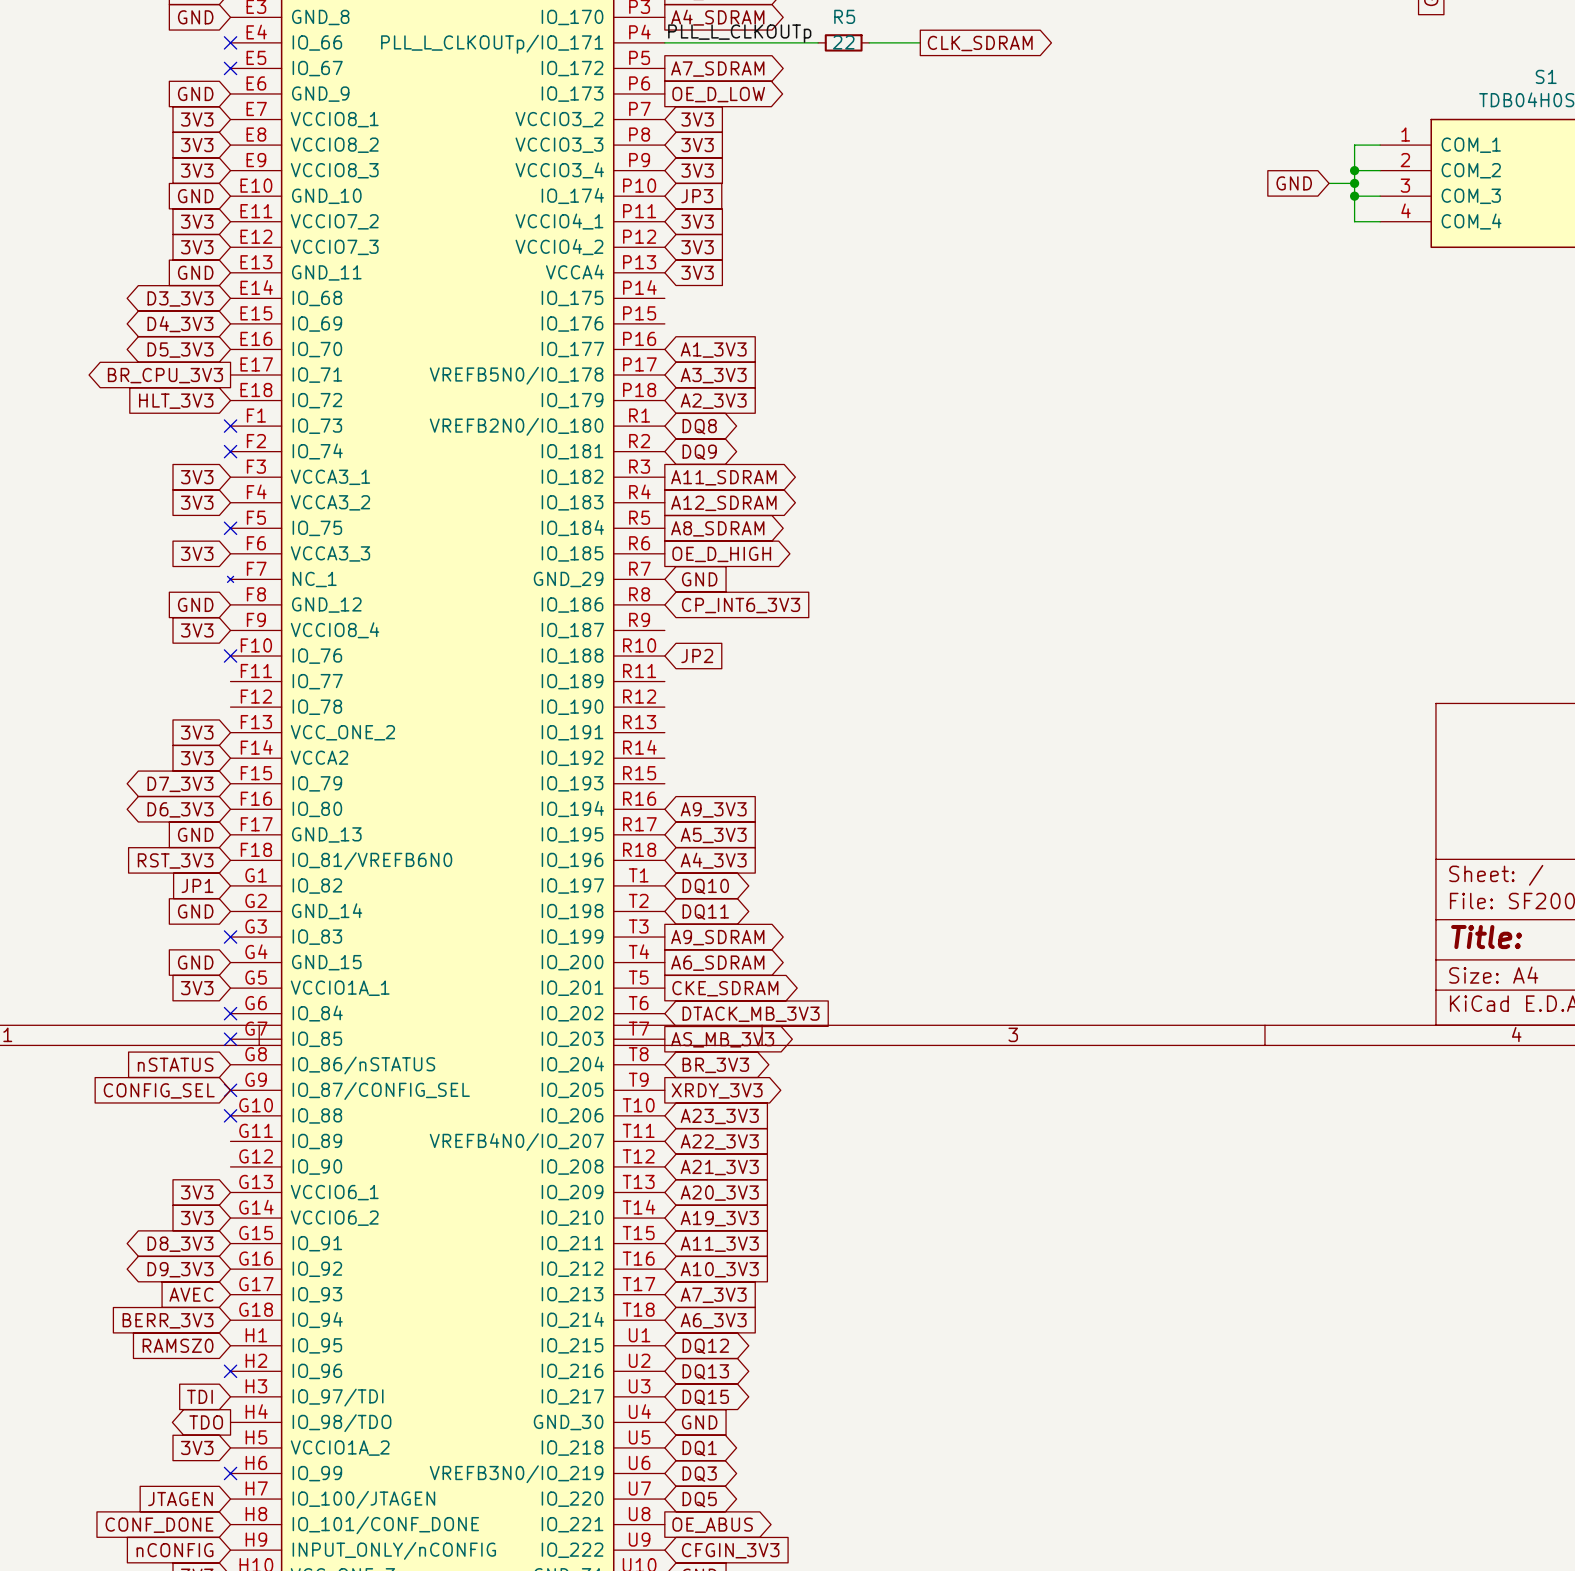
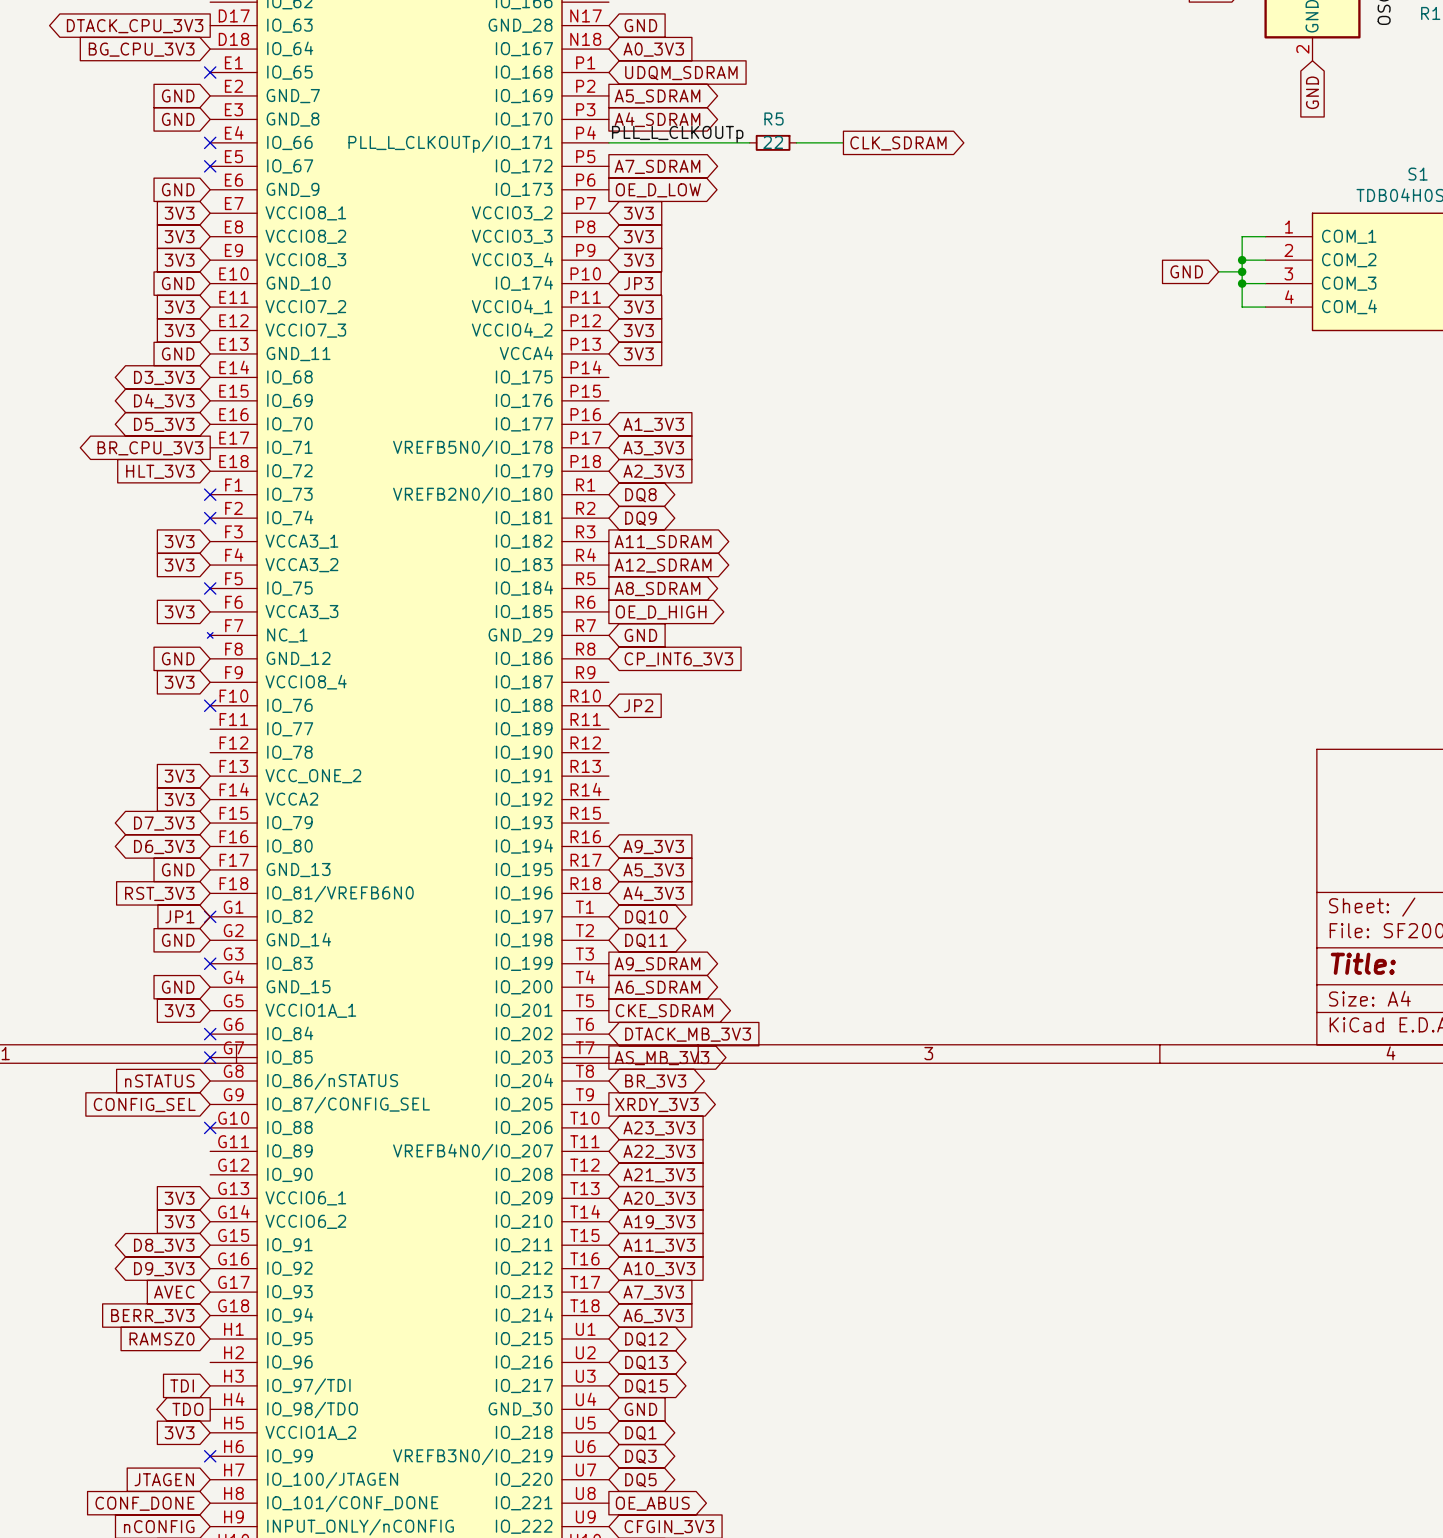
no-connect mark: none -> (210, 916)
no-connect mark: (230, 1090) -> none
no-connect mark: (230, 1371) -> none

